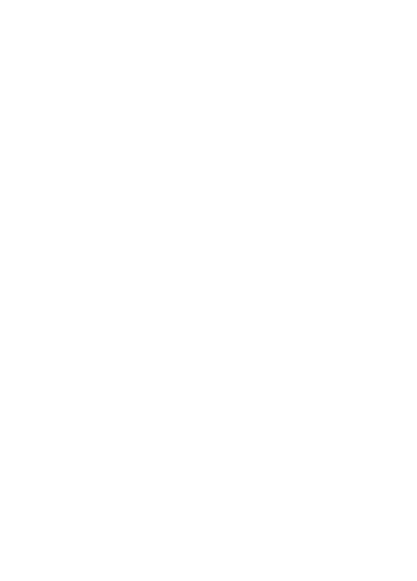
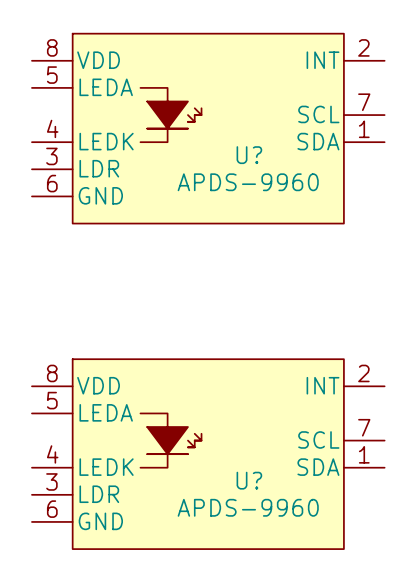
U?: none -> APDS-9960 (208, 128)
U?: none -> APDS-9960 (208, 454)

